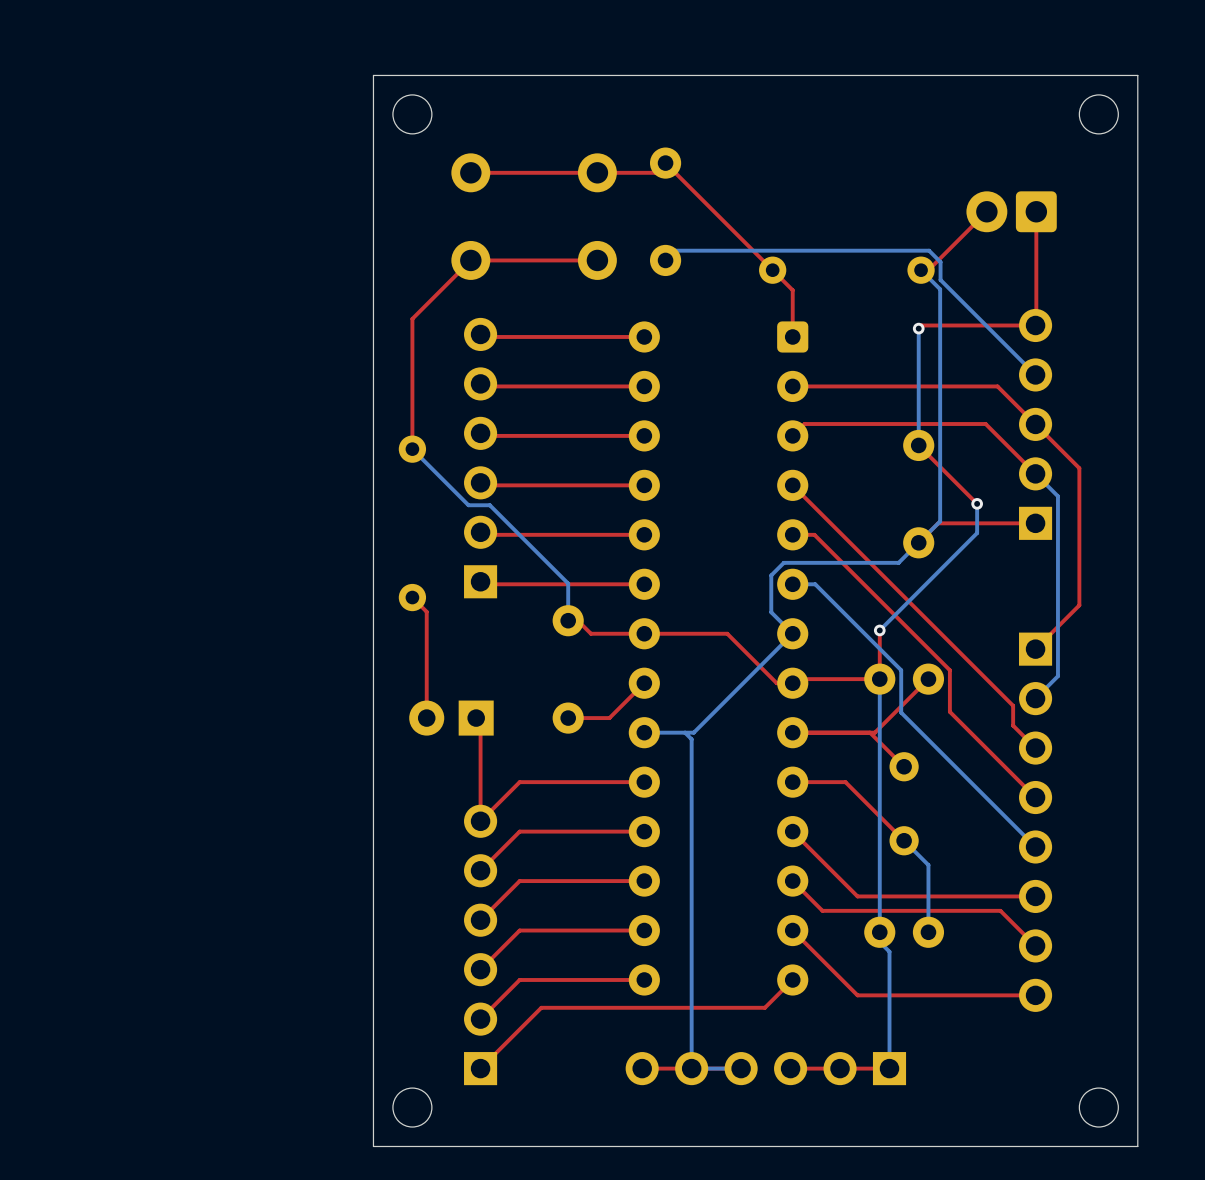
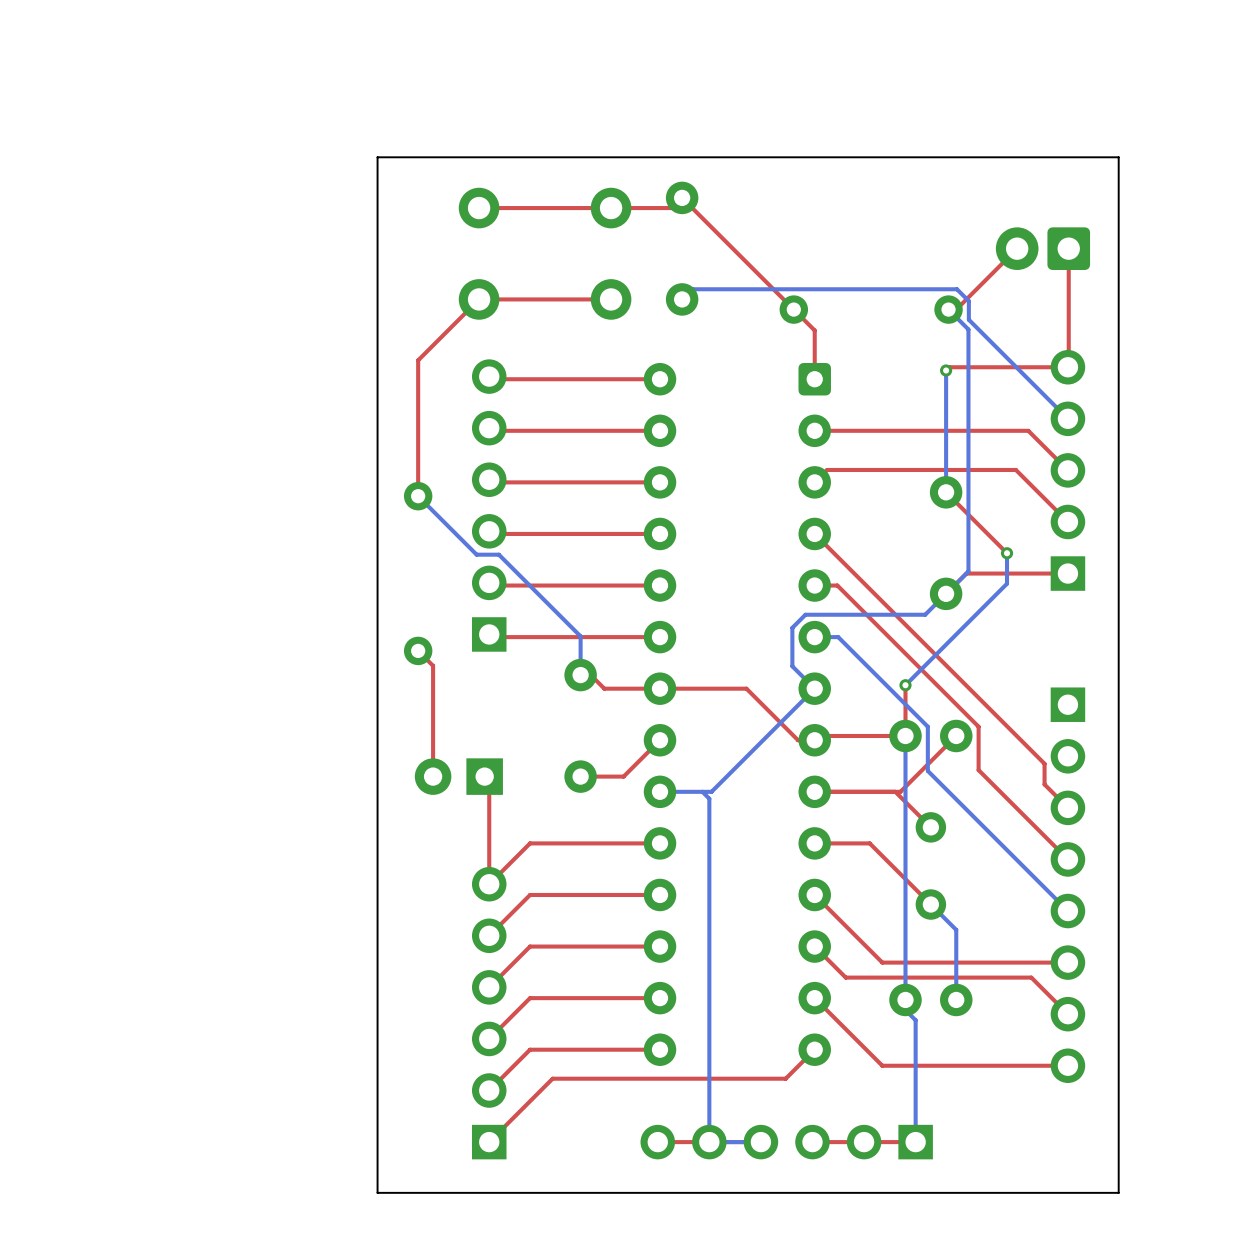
round board edge: [392, 94, 433, 135] -> none
round board edge: [1078, 94, 1119, 135] -> none
board edge: (373, 124) (373, 75) (1137, 75) (1137, 1146) (373, 1146) (373, 1117) -> (377, 157) (1118, 157) (1118, 1192) (377, 1192)
top track: (1035, 424) (1079, 468) (1079, 605) (1035, 649) -> none
bottom track: (1035, 473) (1057, 496) (1057, 676) (1035, 698) -> none
round board edge: [392, 1087, 433, 1128] -> none
round board edge: [1078, 1087, 1119, 1128] -> none

